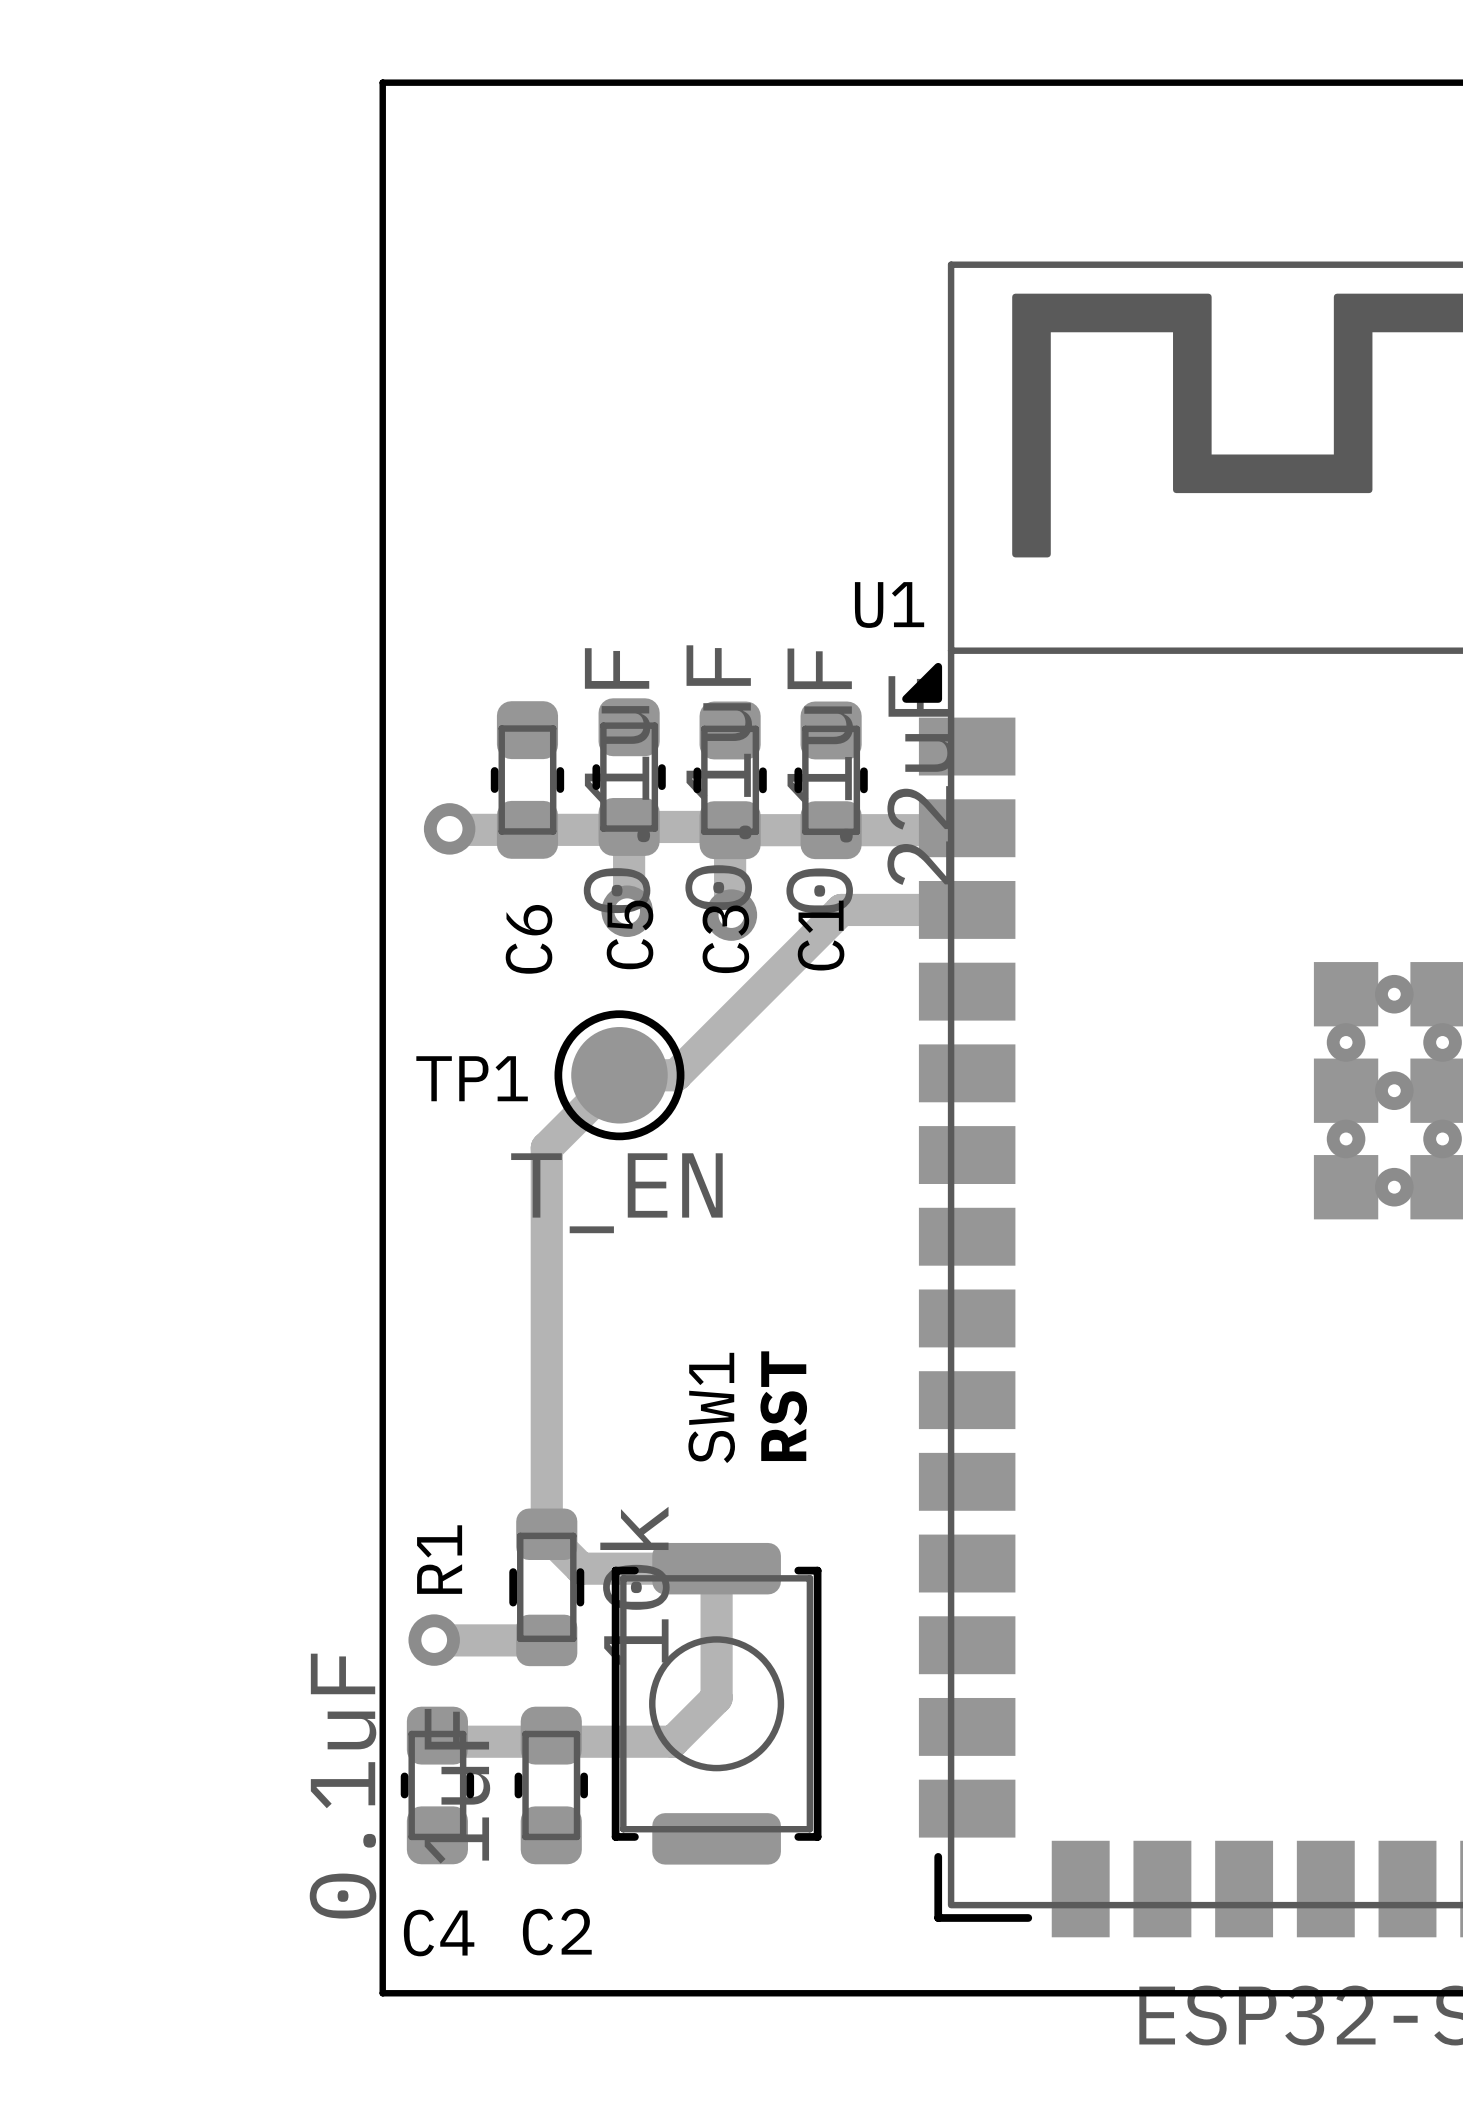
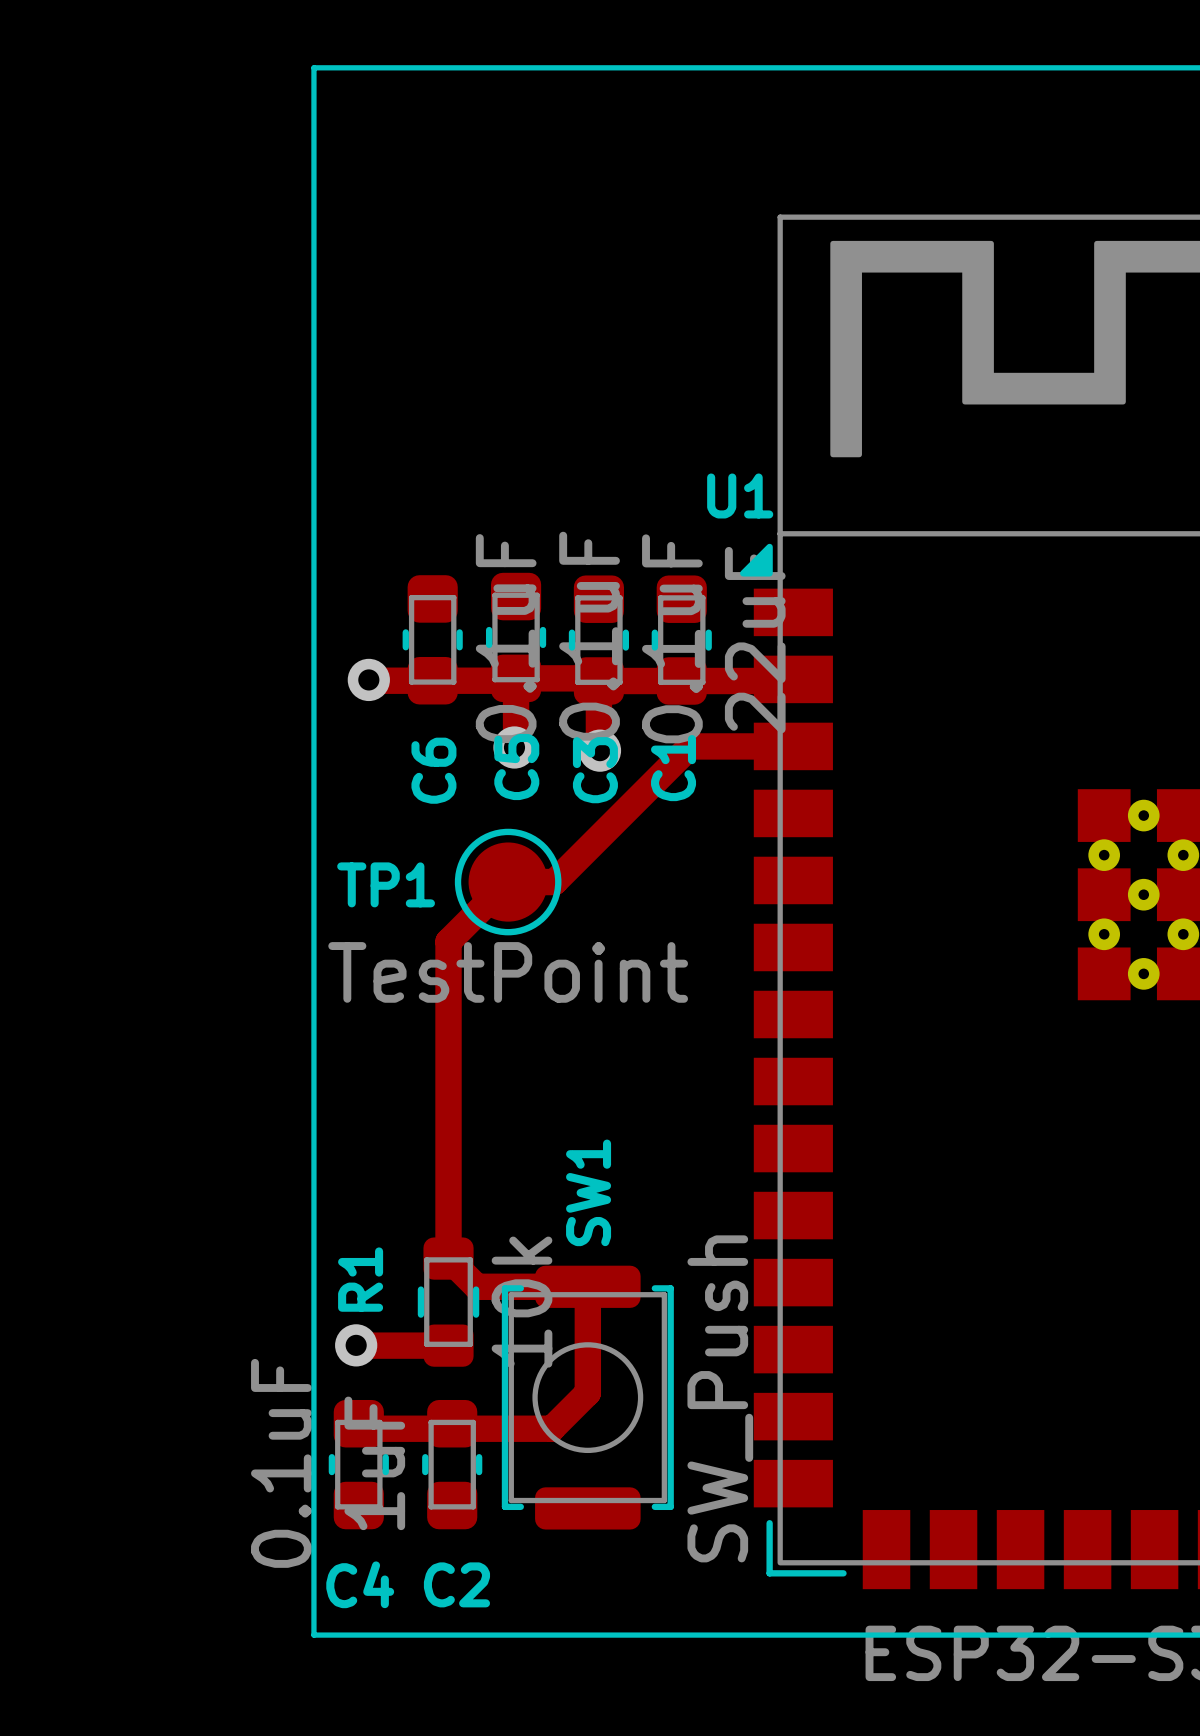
TP1 value: T_EN (616, 1193) -> TestPoint (508, 972)
SW1 value: RST (783, 1406) -> SW_Push (720, 1398)
SW1 name position: SW1 (711, 1407) -> SW1 (588, 1192)

